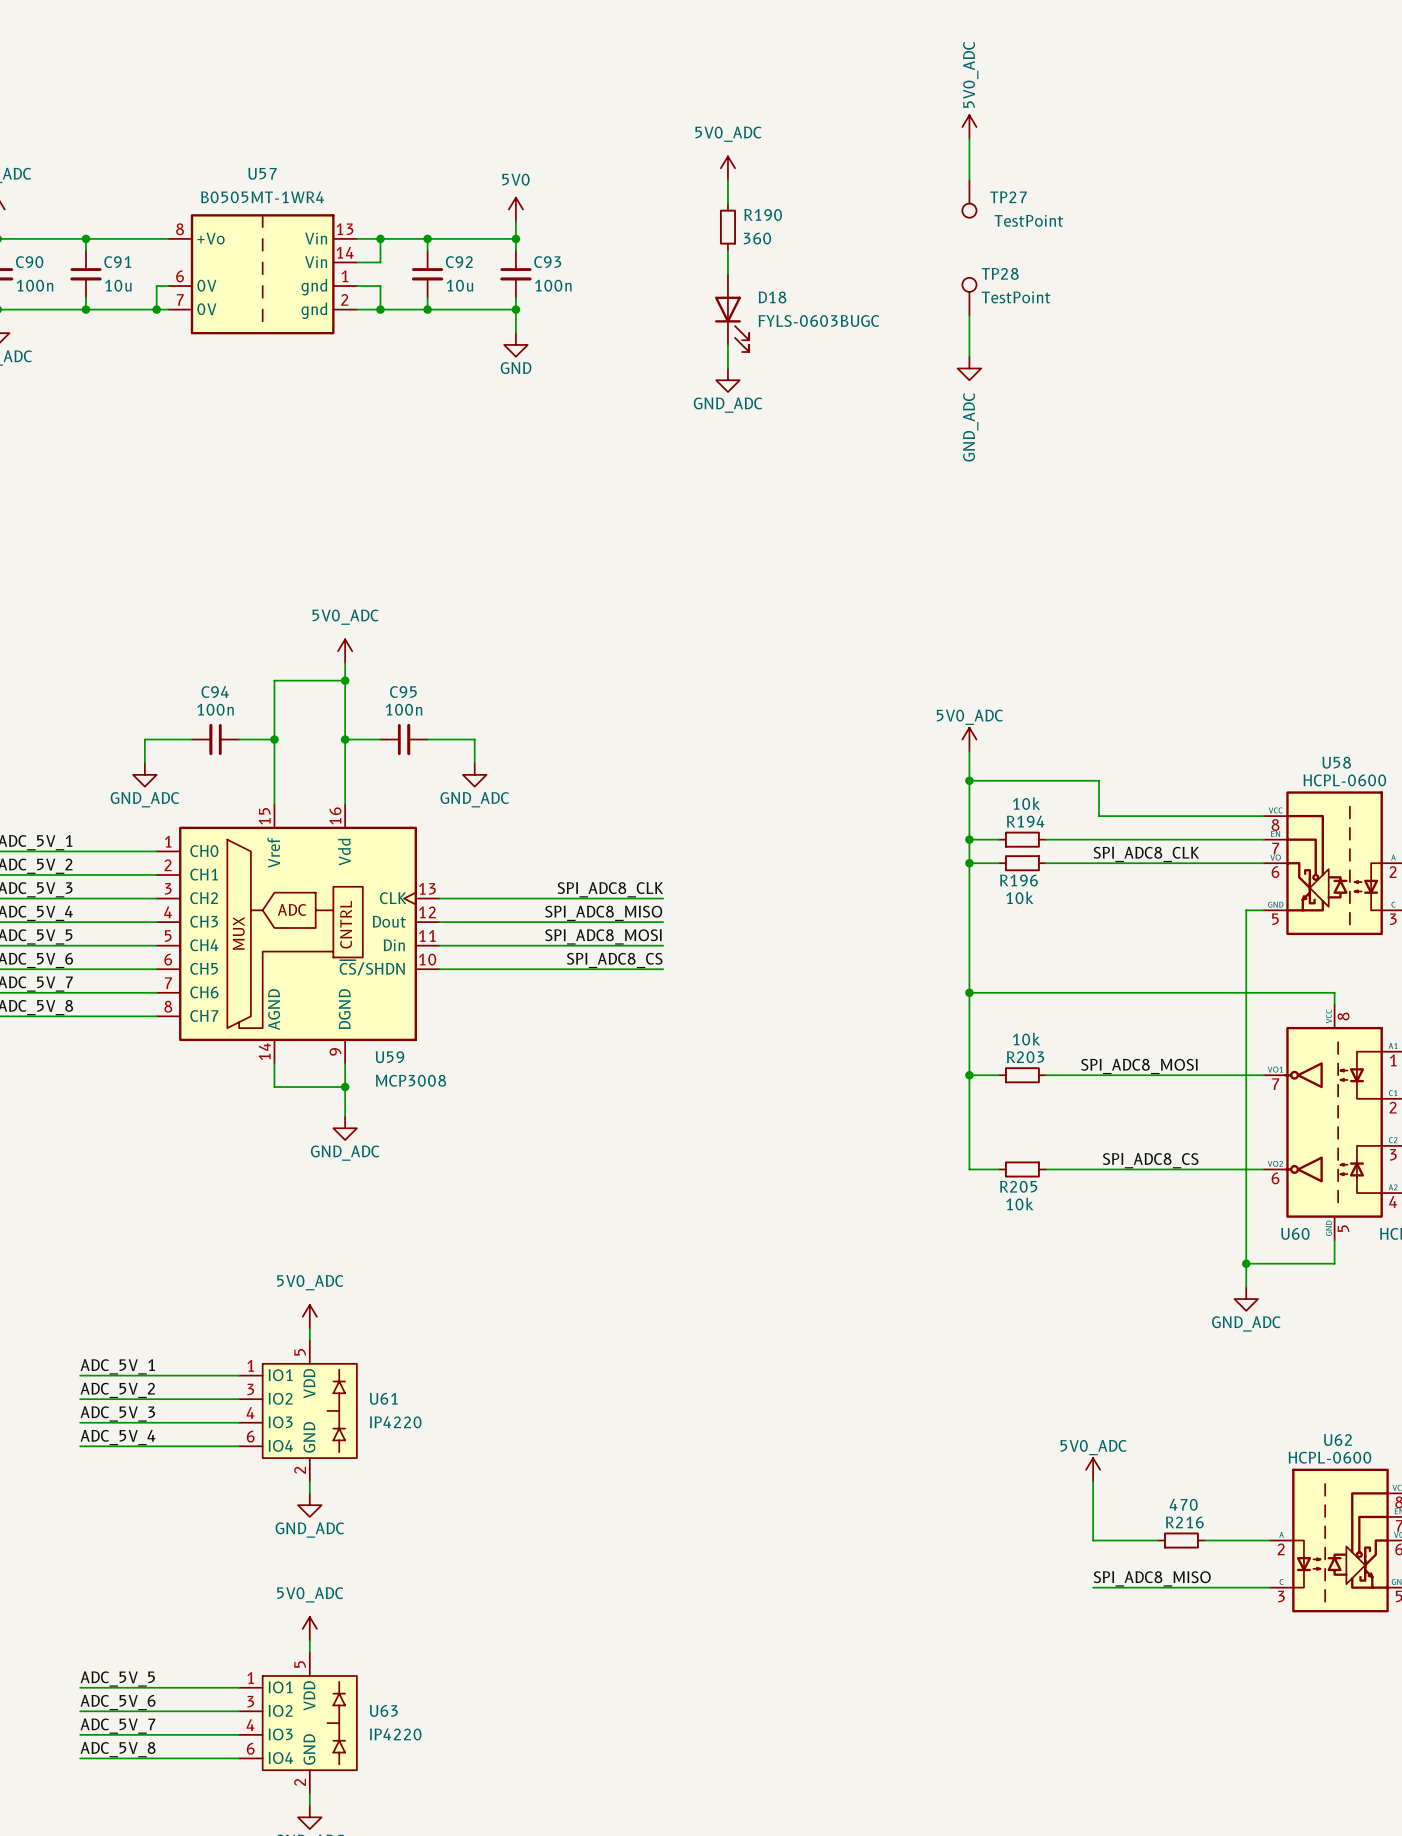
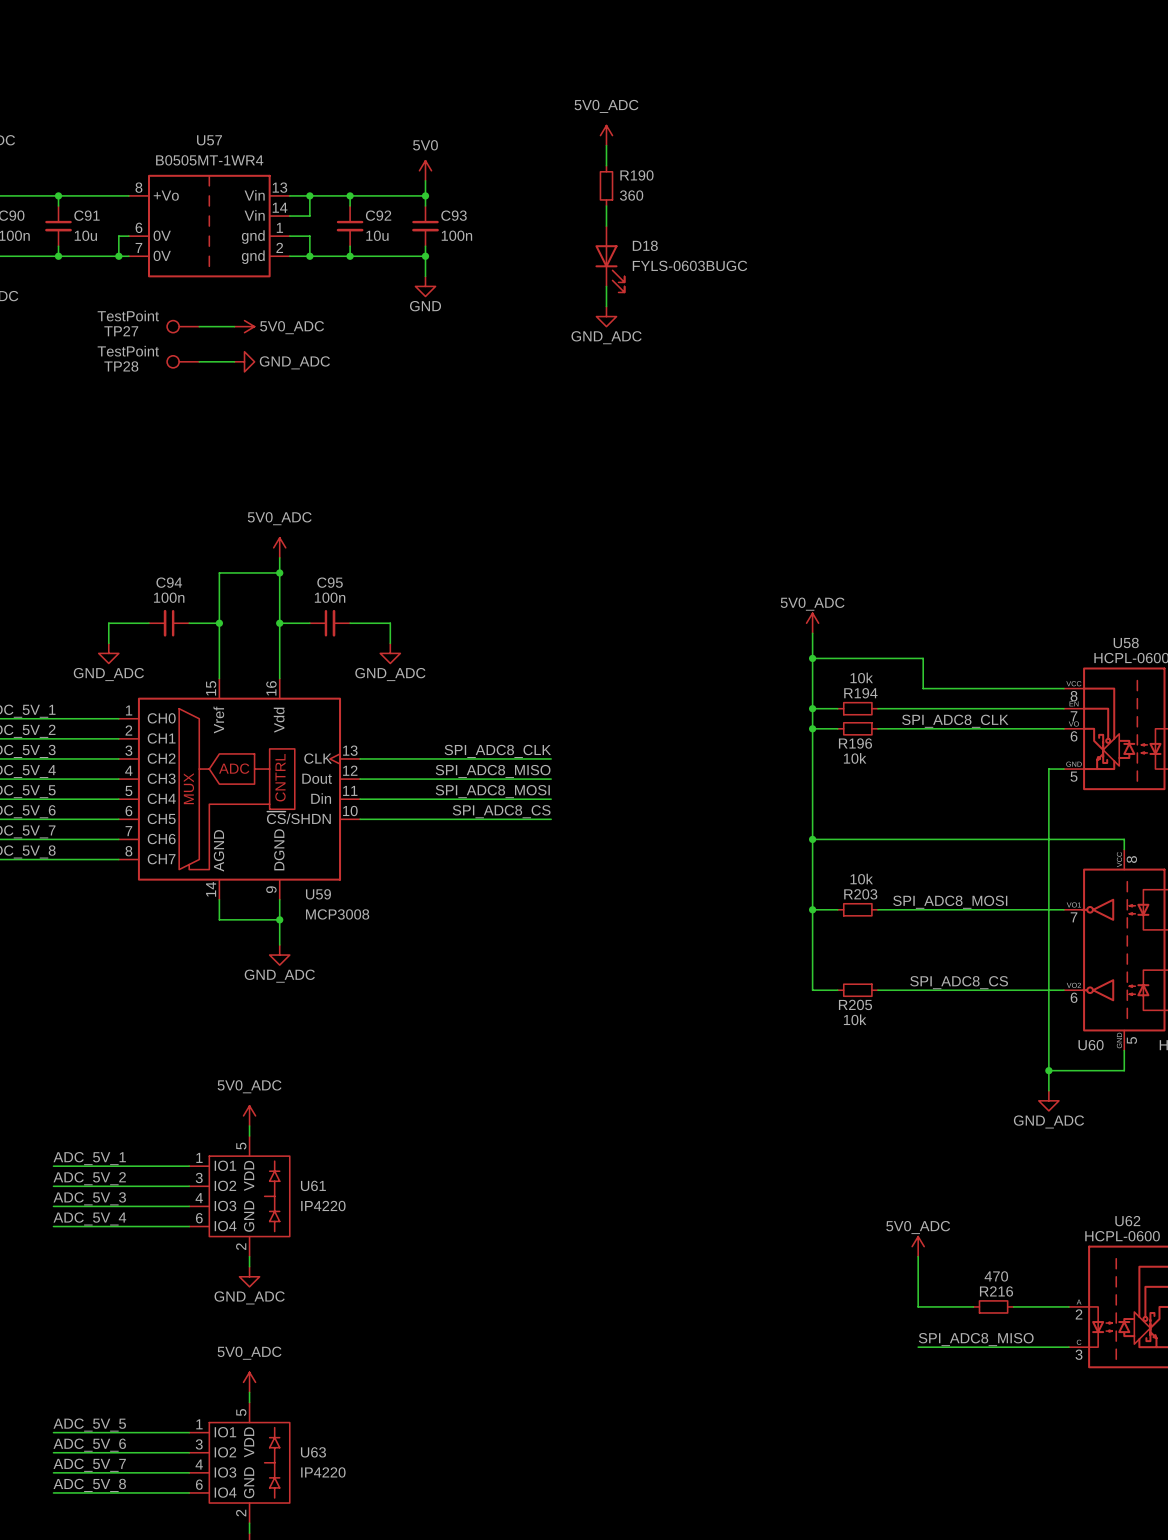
power symbol: 5V0_ADC (969, 127) -> none
wire: (969, 138) (969, 180) -> none
TP27 name position: TP27 (1008, 197) -> TP27 (121, 331)
TP27 position: (969, 198) -> (183, 326)
TP27 rotation: 0° (969, 210) -> 90° clockwise (173, 326)
TP27 value position: TestPoint (1028, 220) -> TestPoint (128, 316)
TP28 name position: TP28 (1000, 273) -> TP28 (121, 366)
TP28 rotation: 0° (969, 284) -> 90° counterclockwise (173, 361)
TP28 position: (969, 296) -> (183, 361)
TP28 value position: TestPoint (1016, 297) -> TestPoint (128, 351)
wire: (969, 315) (969, 356) -> none
power symbol: GND_ADC (969, 368) -> none
wire: none -> (199, 326) (234, 326)
power symbol: none -> 5V0_ADC (244, 326)
wire: none -> (199, 361) (234, 361)
power symbol: none -> GND_ADC (244, 361)

